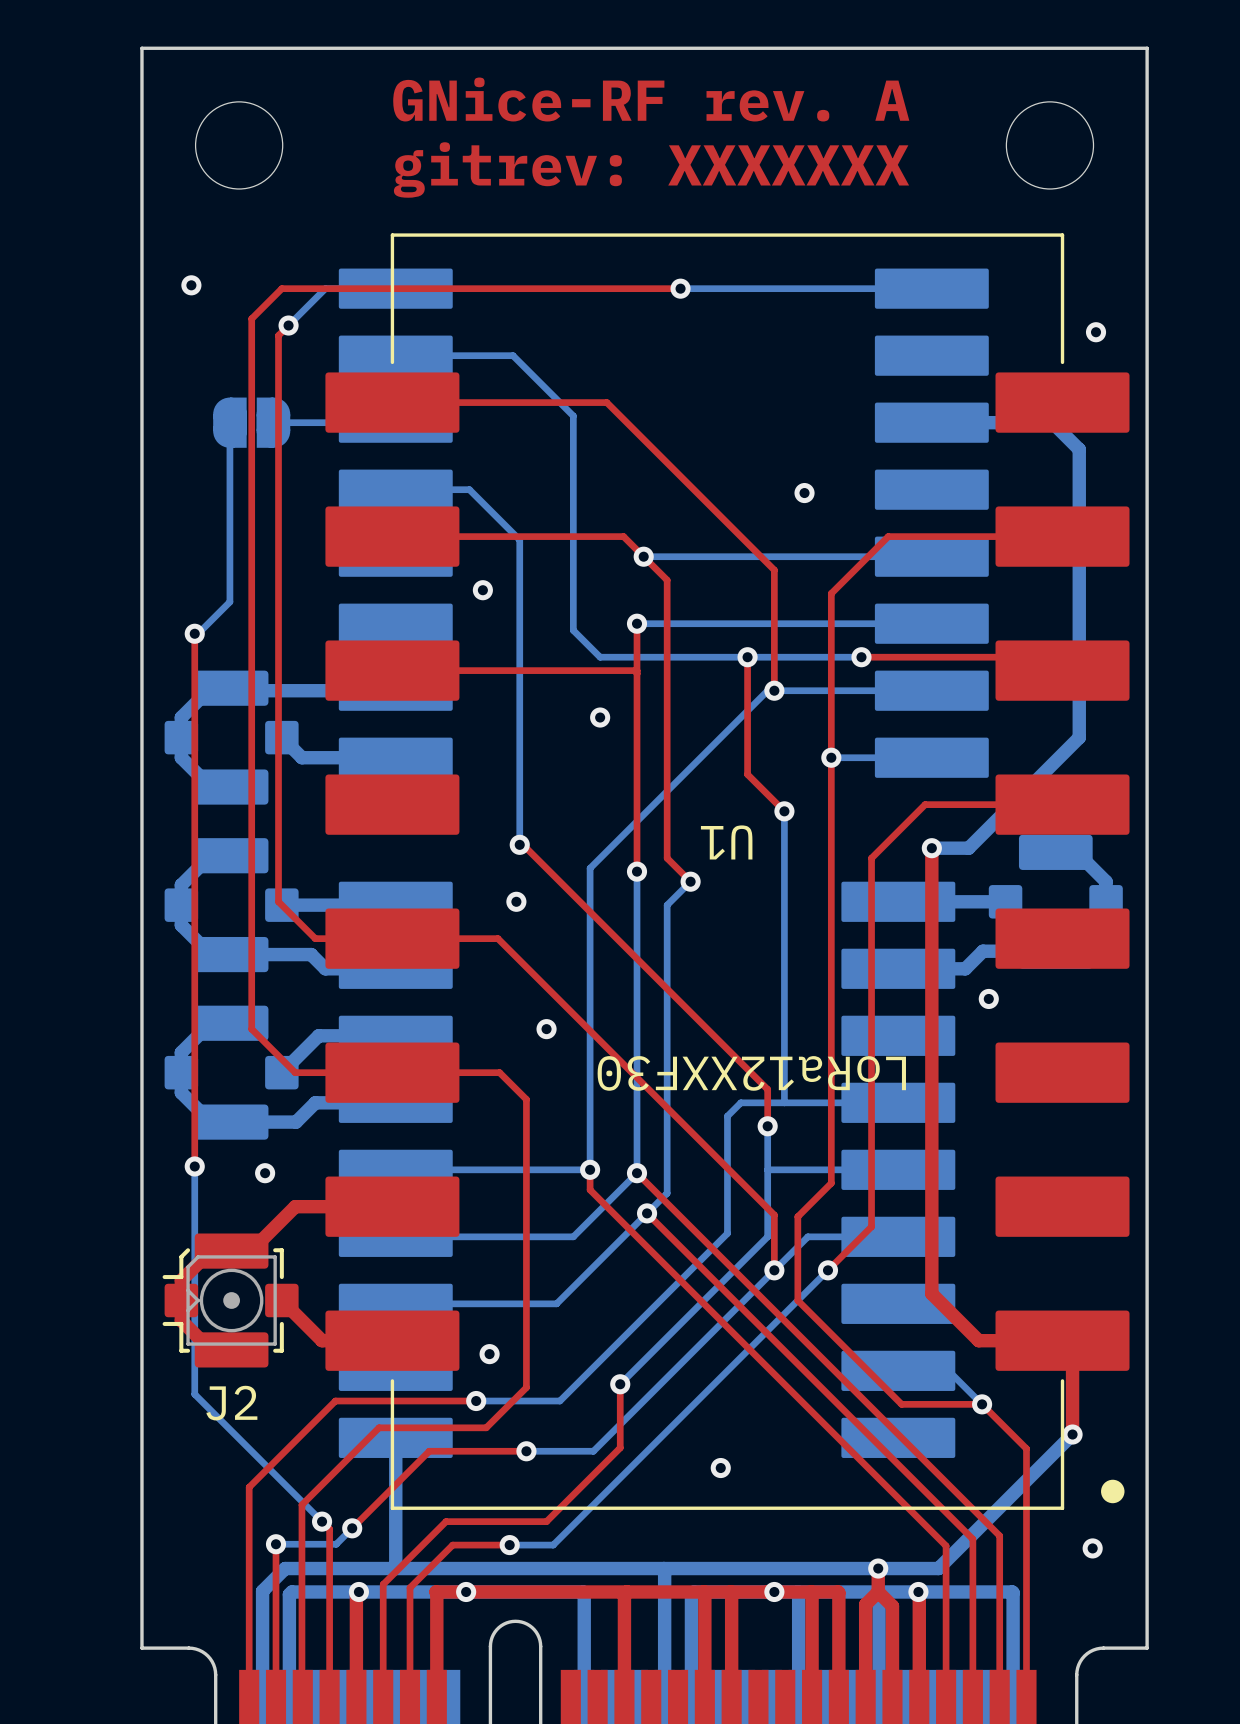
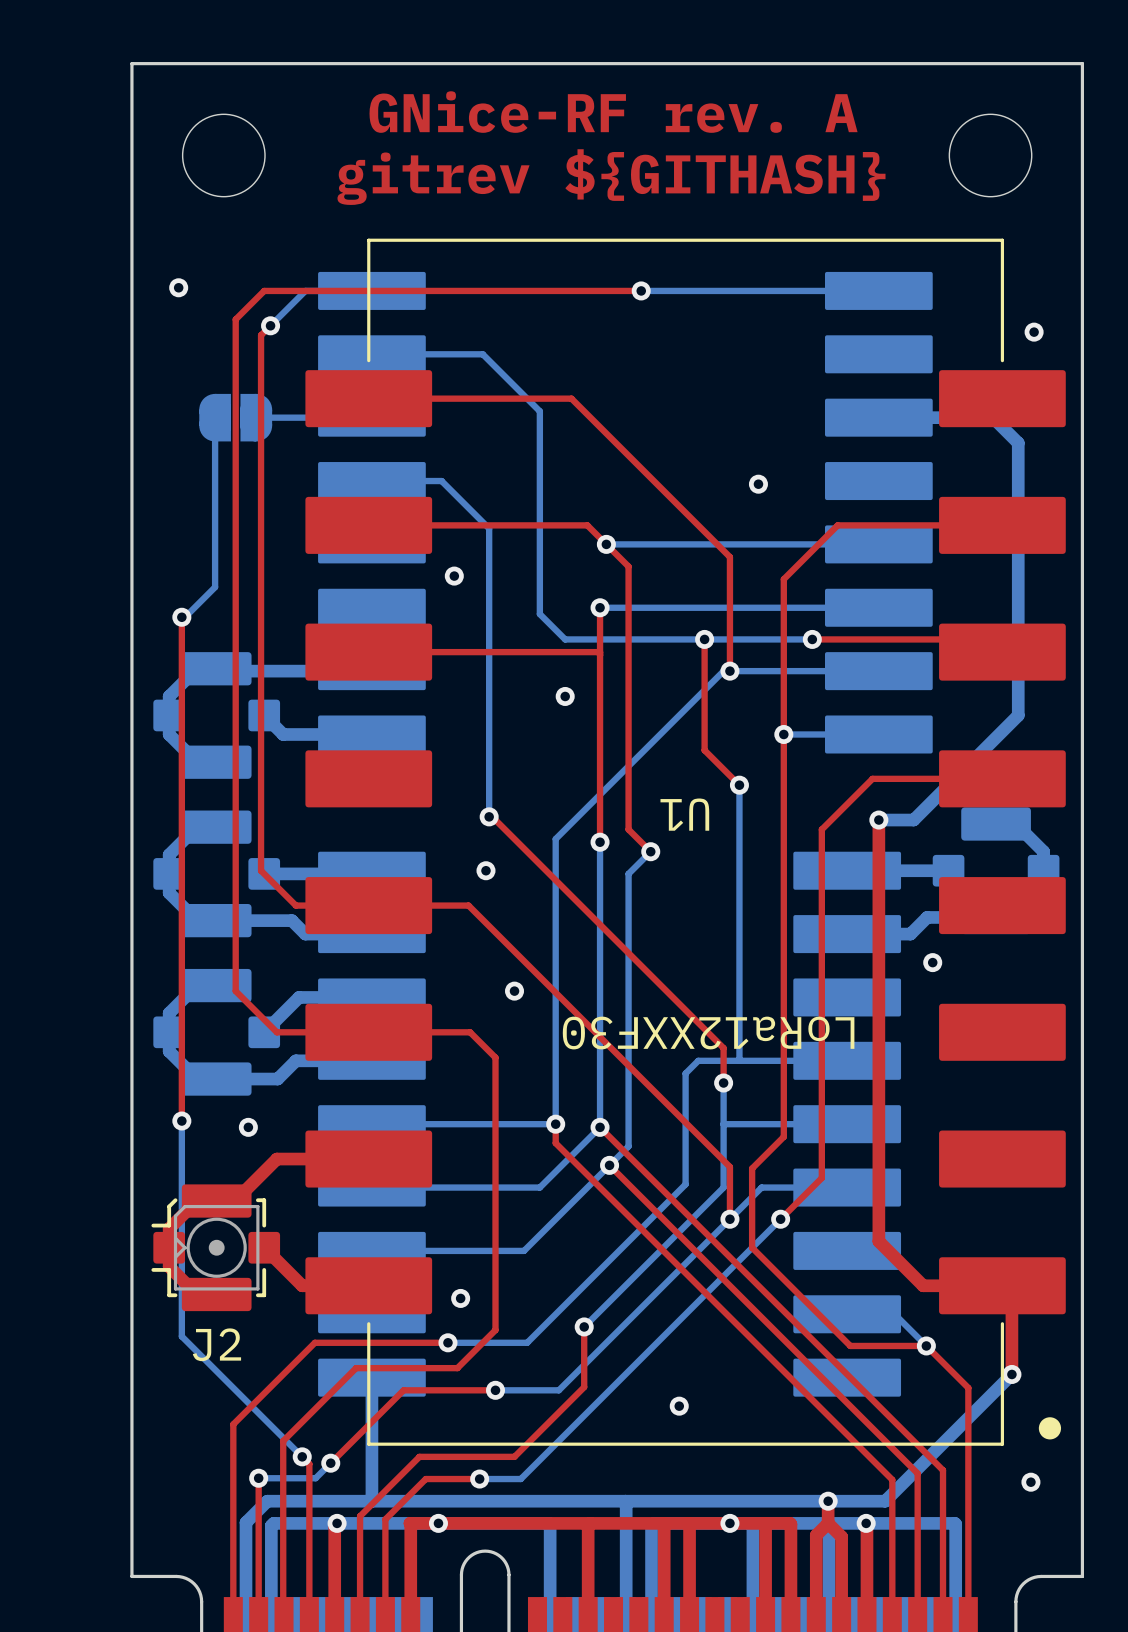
text: gitrev: XXXXXXX (651, 169) -> gitrev ${GITHASH} (611, 177)

